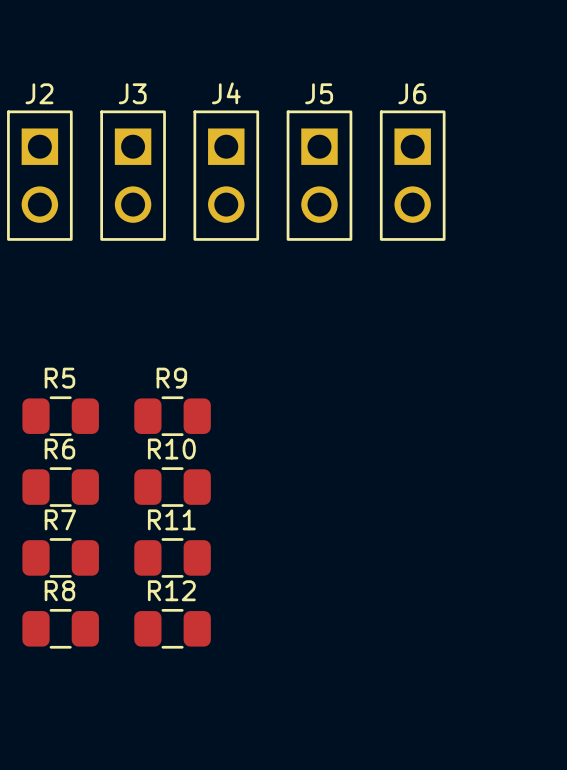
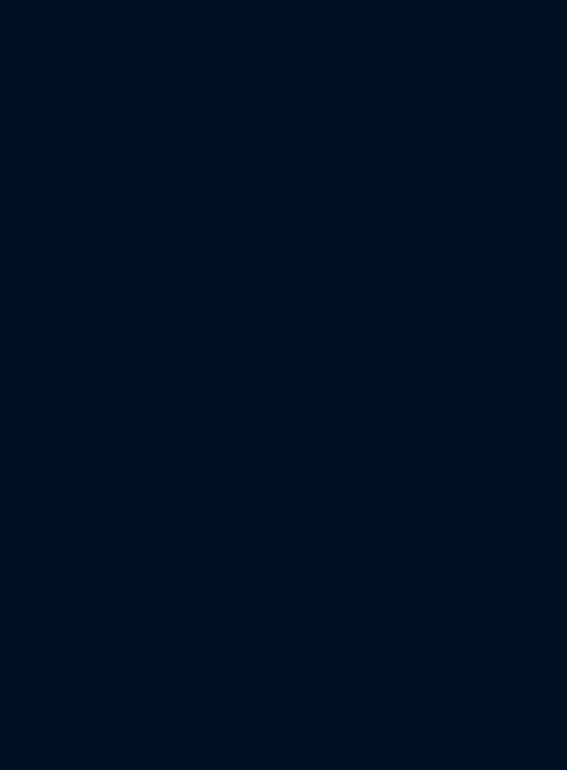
J2: (39, 175) -> none
J3: (133, 175) -> none
J4: (226, 175) -> none
J5: (319, 175) -> none
J6: (412, 175) -> none
R5: (60, 416) -> none
R9: (172, 416) -> none
R6: (60, 487) -> none
R10: (172, 487) -> none
R7: (60, 557) -> none
R11: (172, 557) -> none
R8: (60, 628) -> none
R12: (172, 628) -> none

